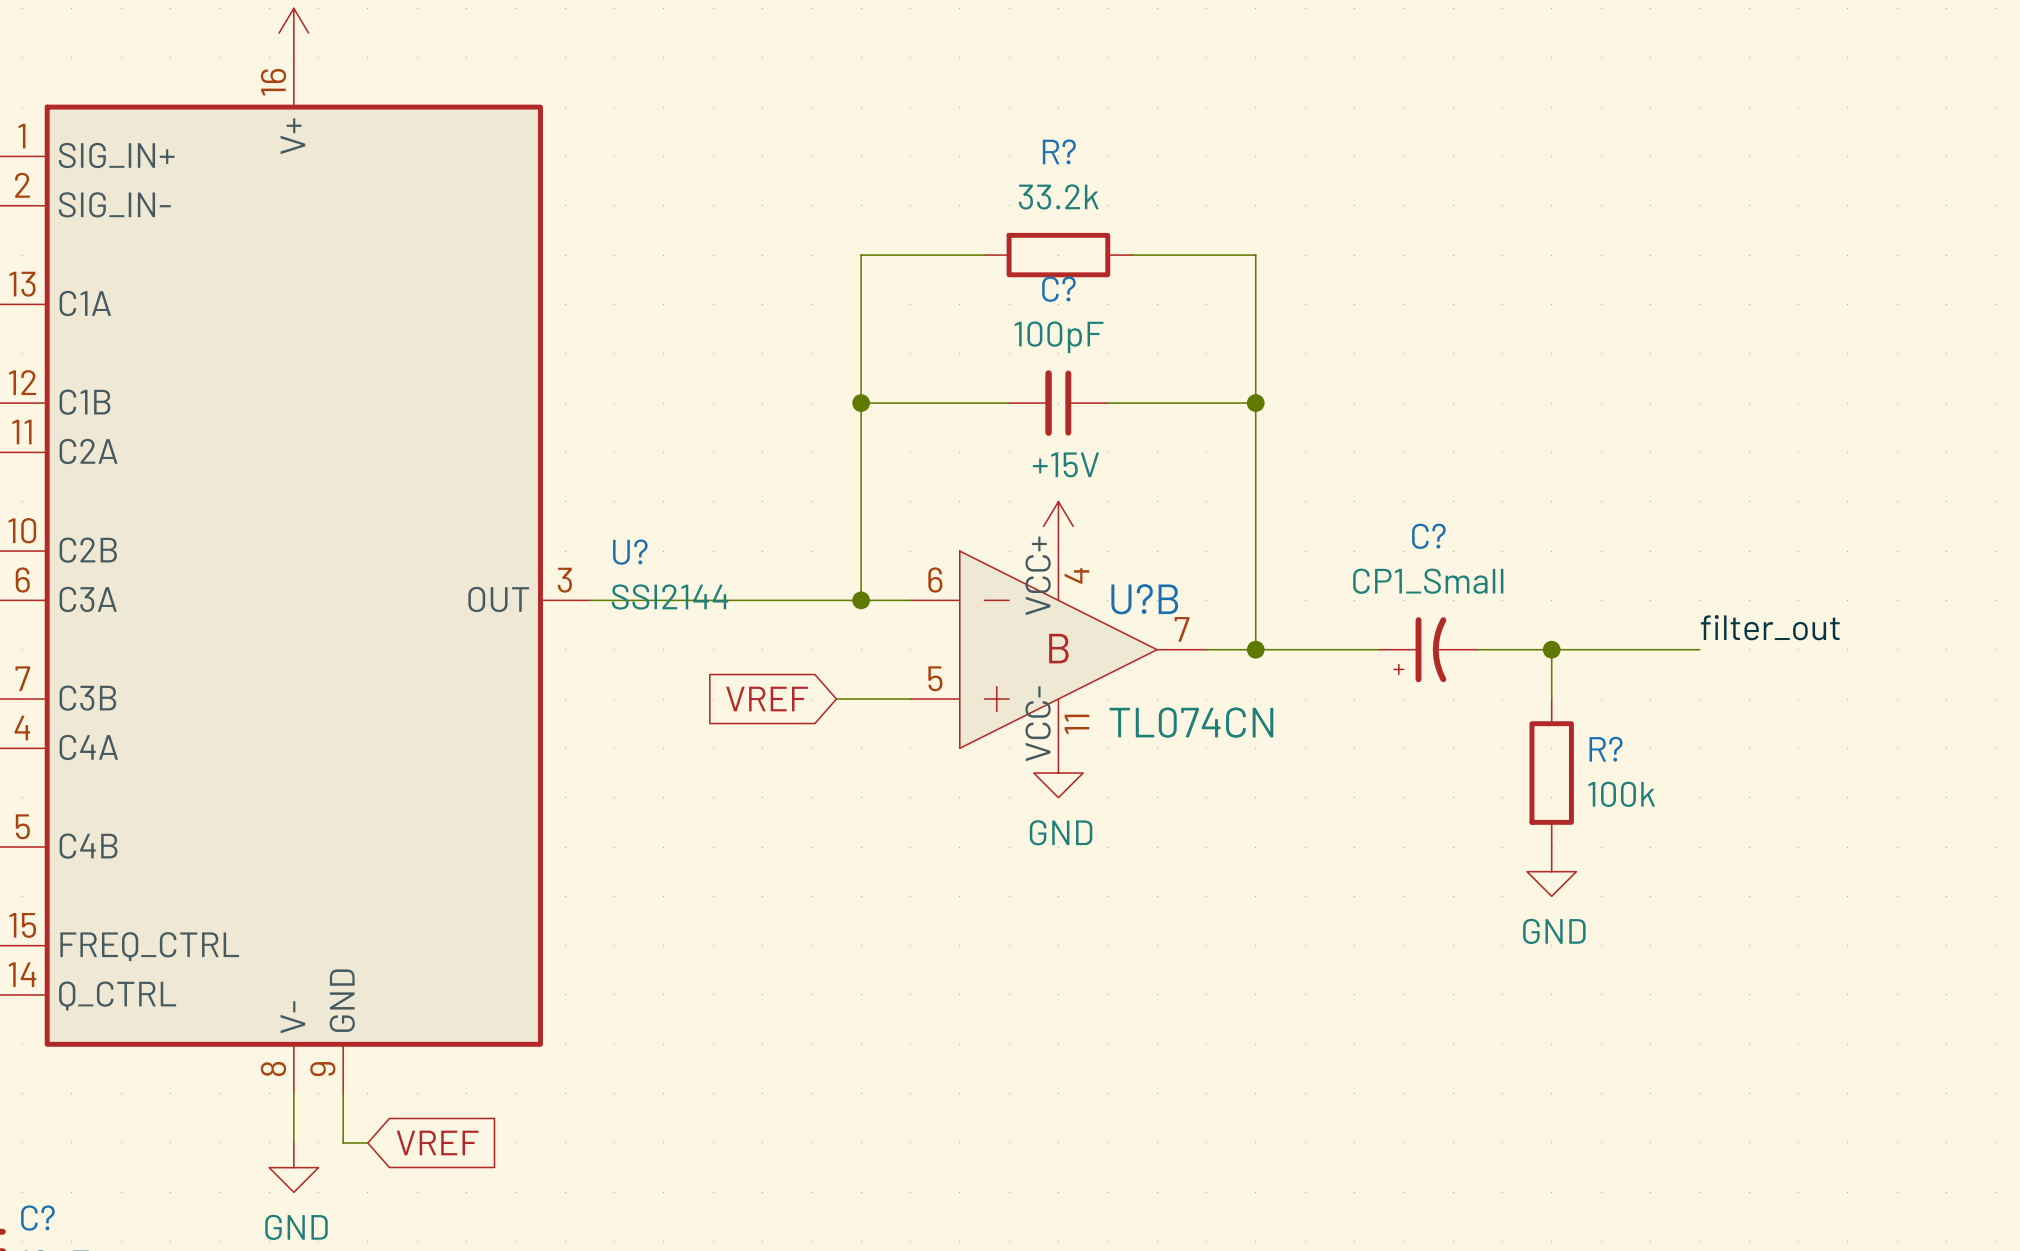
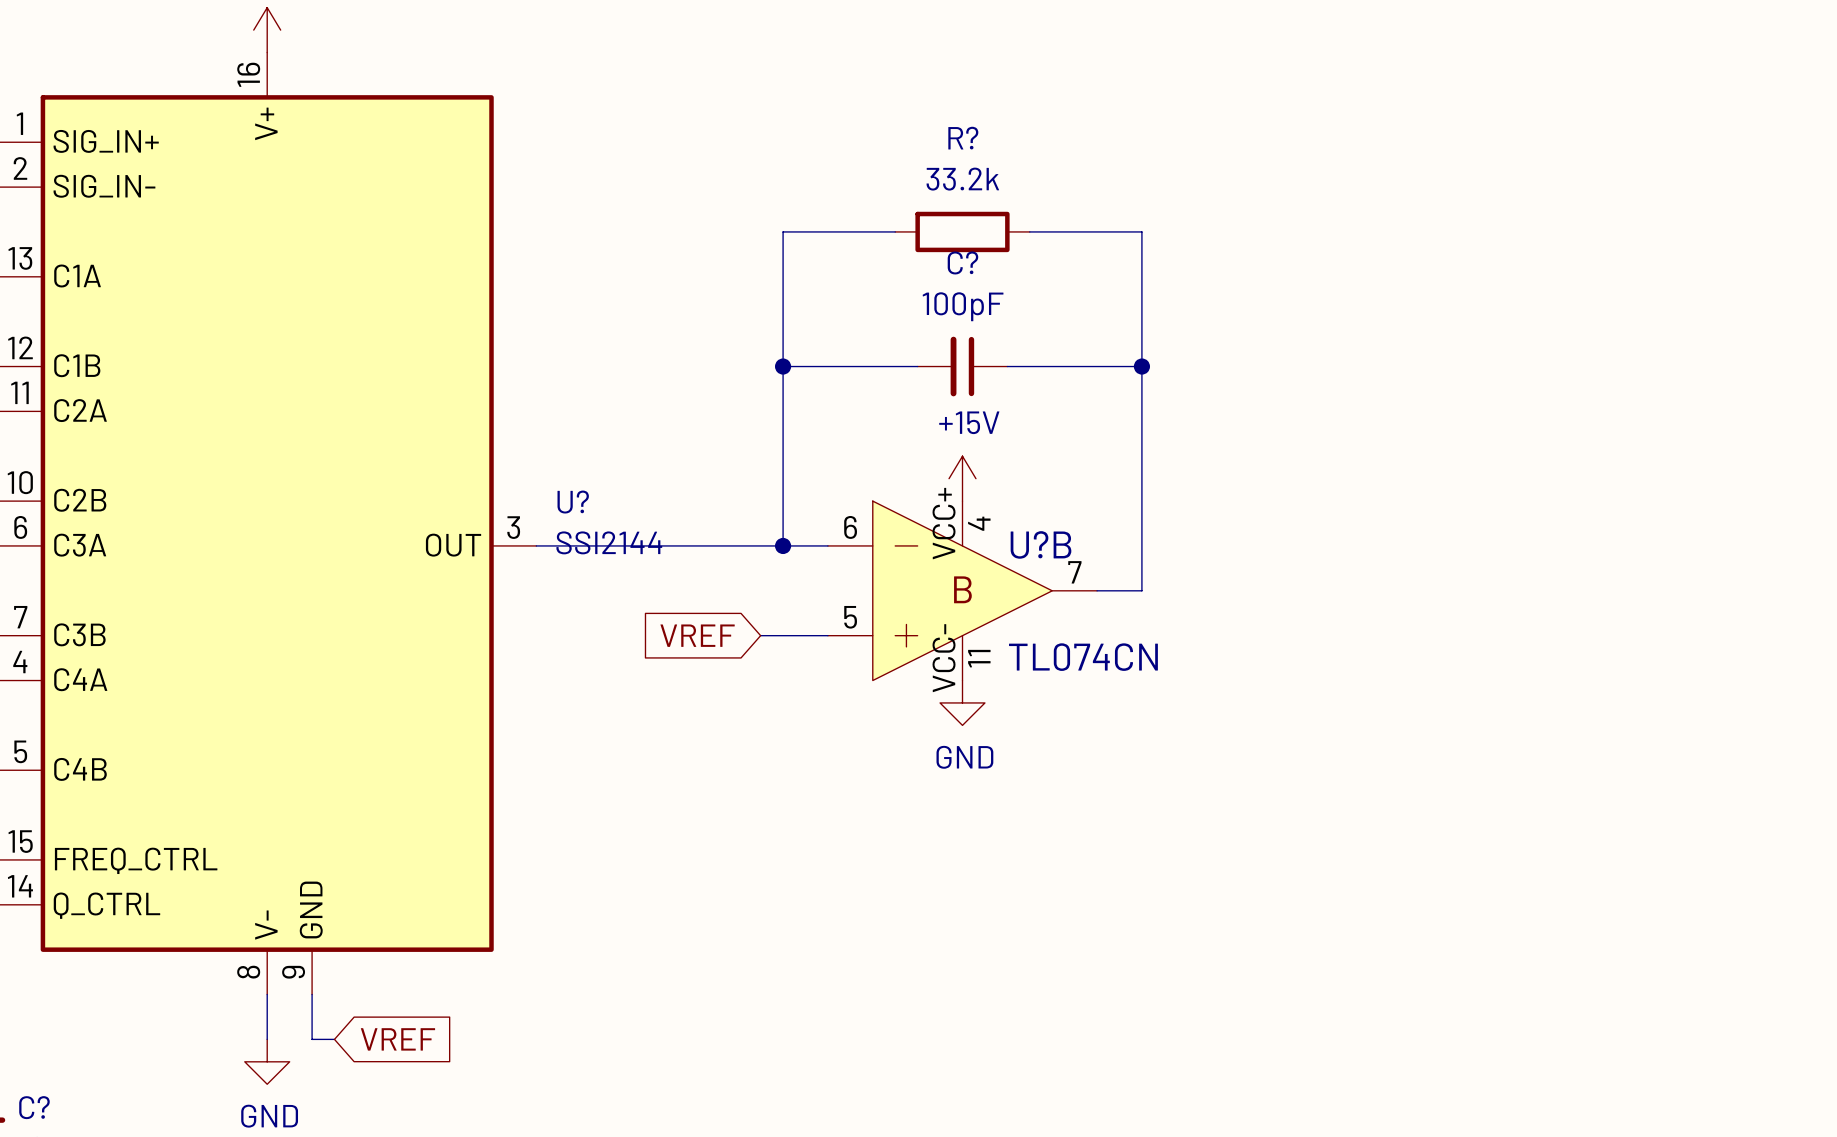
label: filter_out (1770, 627) -> none
wire: (1255, 649) (1379, 649) -> none
junction: (1255, 649) -> none
C?: CP1_Small (1428, 649) -> none
wire: (1477, 649) (1699, 649) -> none
wire: (1551, 649) (1551, 699) -> none
junction: (1551, 649) -> none
R?: 100k (1551, 773) -> none
power symbol: GND (1551, 871) -> none

